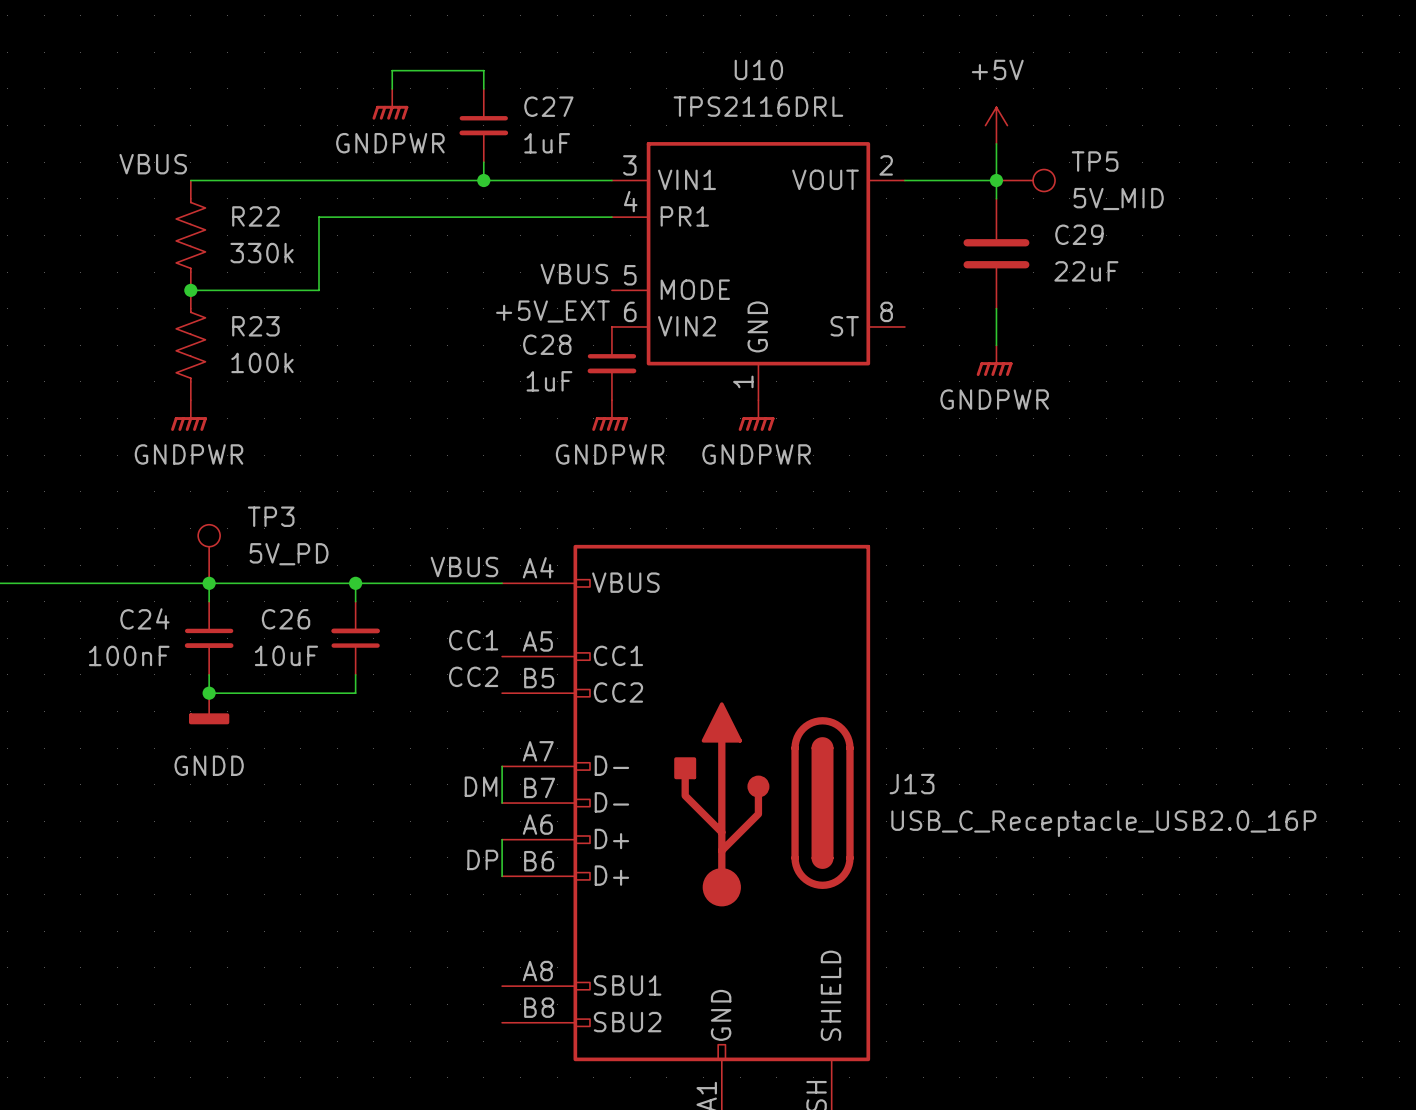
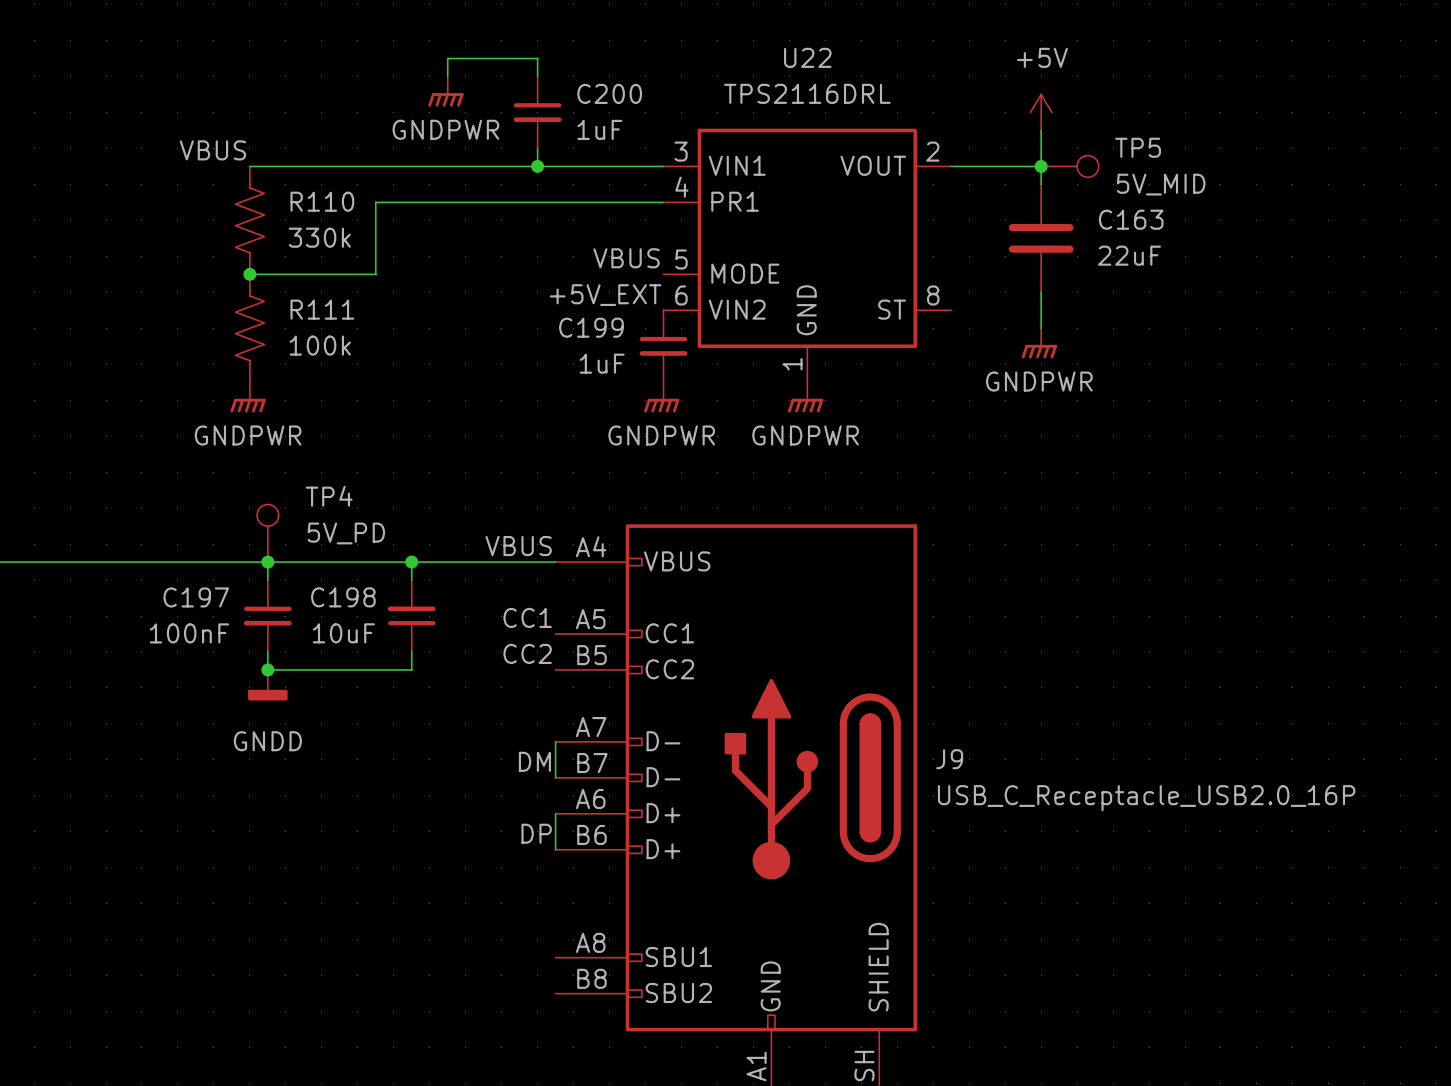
U10 name: U10 (758, 69) -> U22 (807, 57)
C27 name: C27 (548, 106) -> C200 (609, 93)
R22 name: R22 (255, 216) -> R110 (322, 201)
C29 name: C29 (1079, 234) -> C163 (1131, 219)
R23 name: R23 (255, 326) -> R111 (322, 309)
C28 name: C28 (547, 344) -> C199 (591, 327)
TP3 name: TP3 (271, 516) -> TP4 (329, 496)
C24 name: C24 (144, 618) -> C197 (196, 597)
C26 name: C26 (286, 619) -> C198 (343, 597)
J13 name: J13 (912, 784) -> J9 (949, 759)

